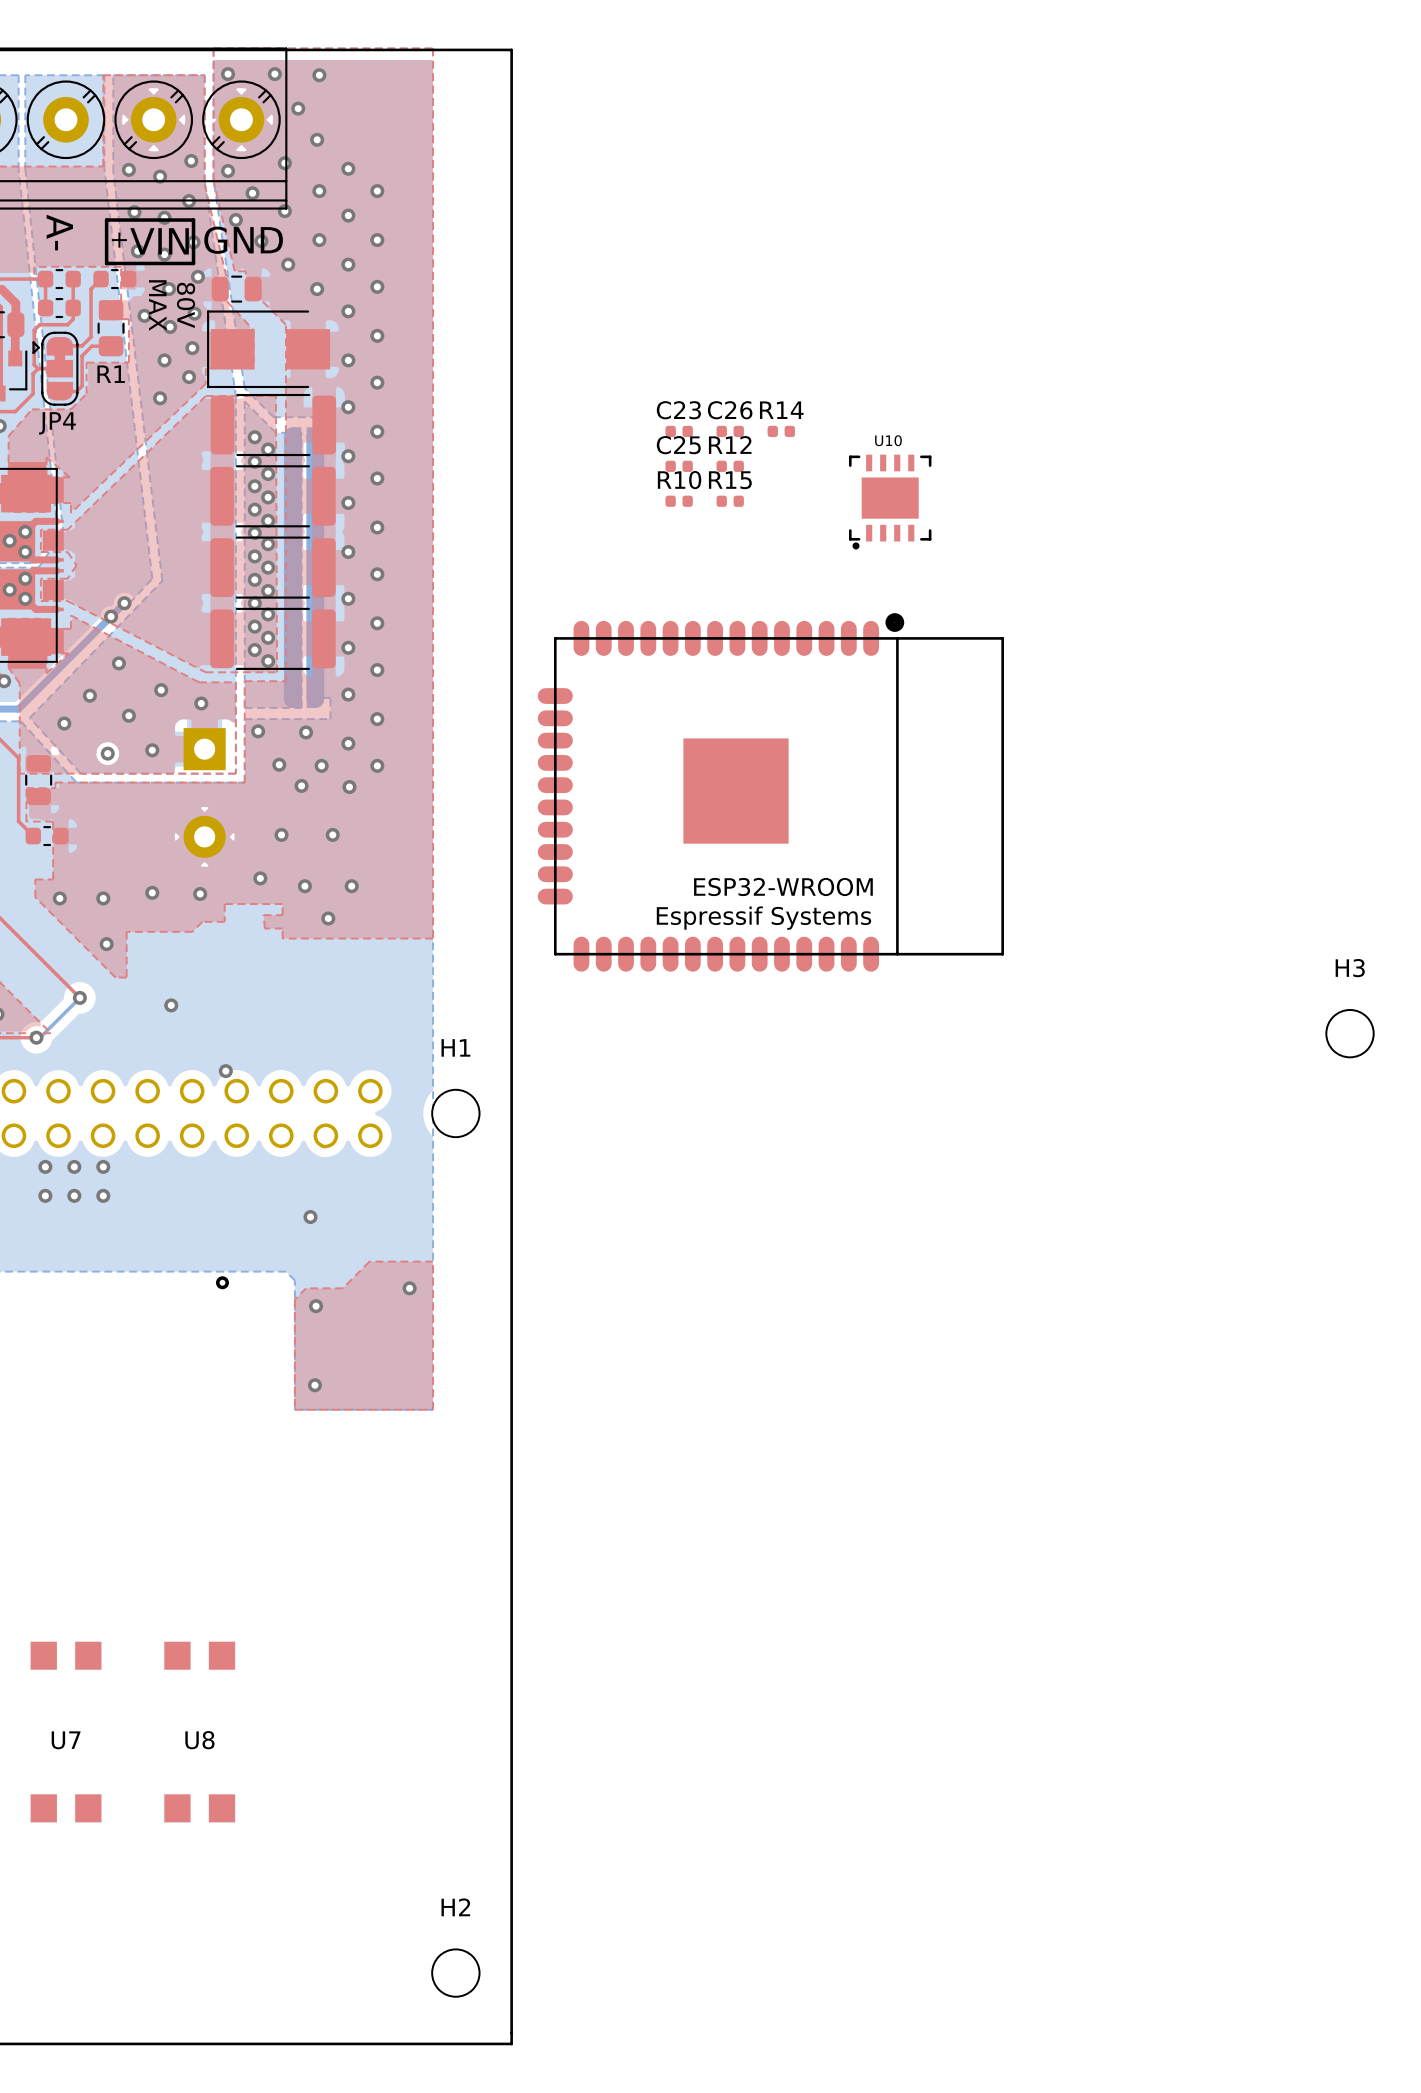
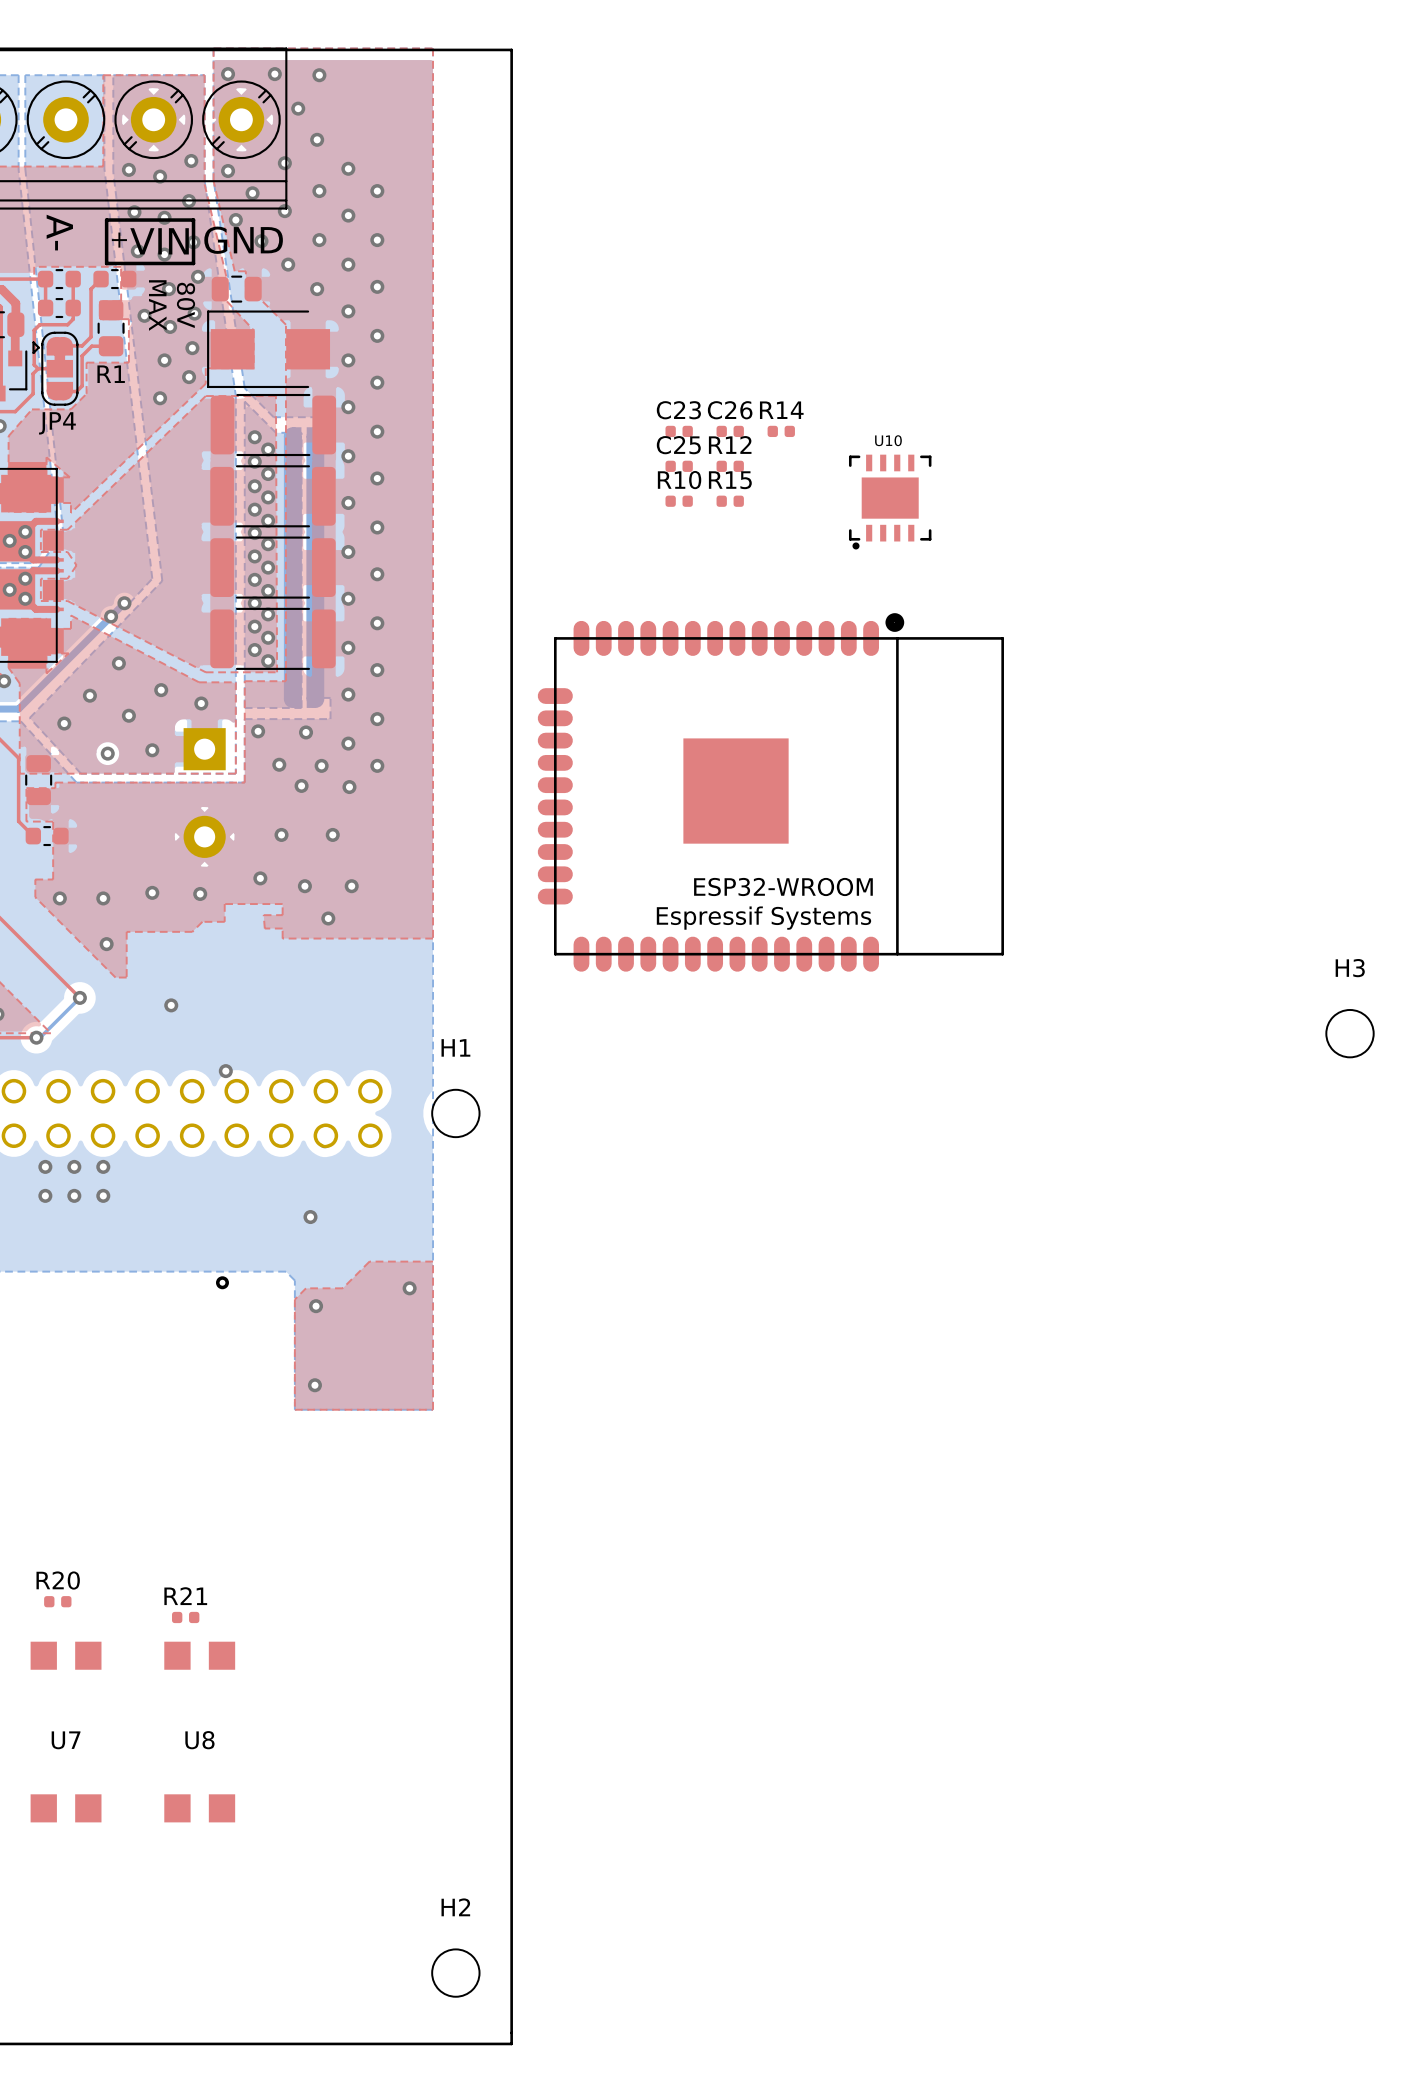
R20: none -> (57, 1601)
R21: none -> (185, 1617)

